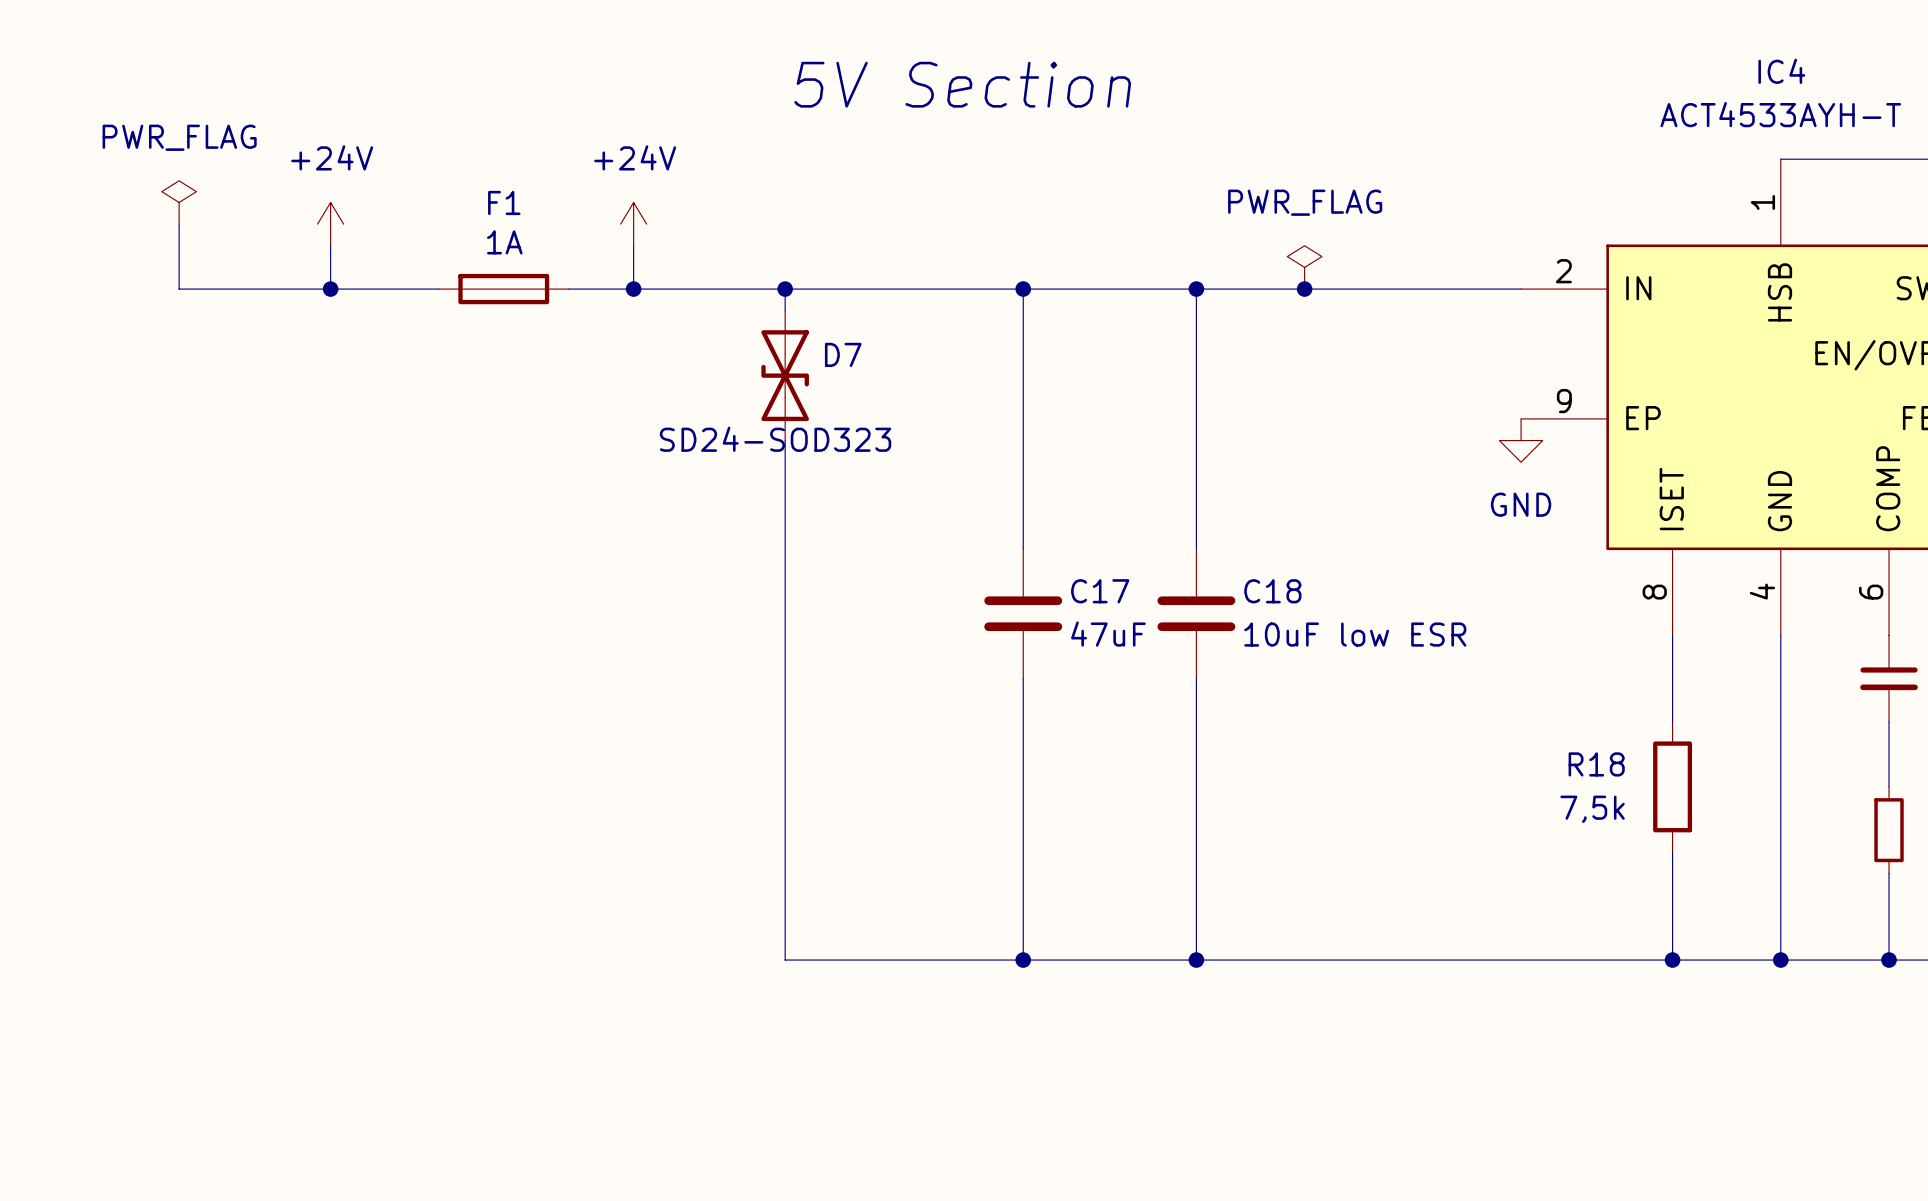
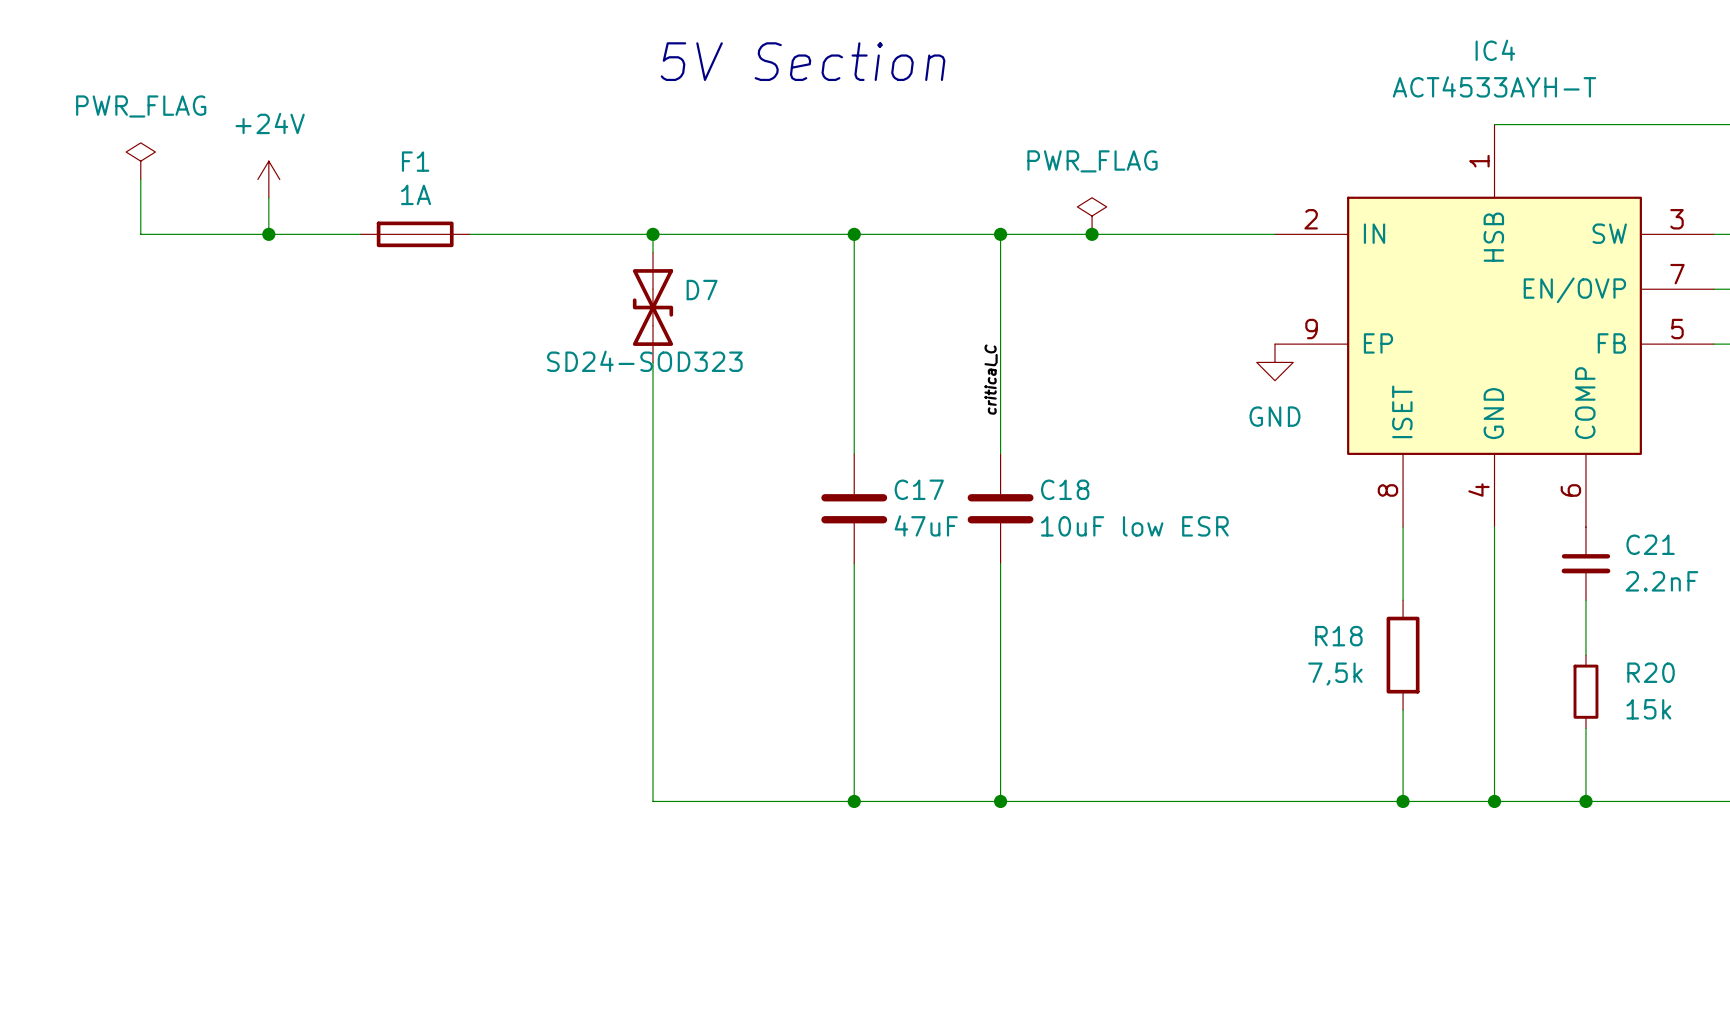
power symbol: +24V (633, 224) -> none
wire: (633, 245) (633, 289) -> none
junction: (633, 289) -> none
label: none -> critical_C (991, 379)

